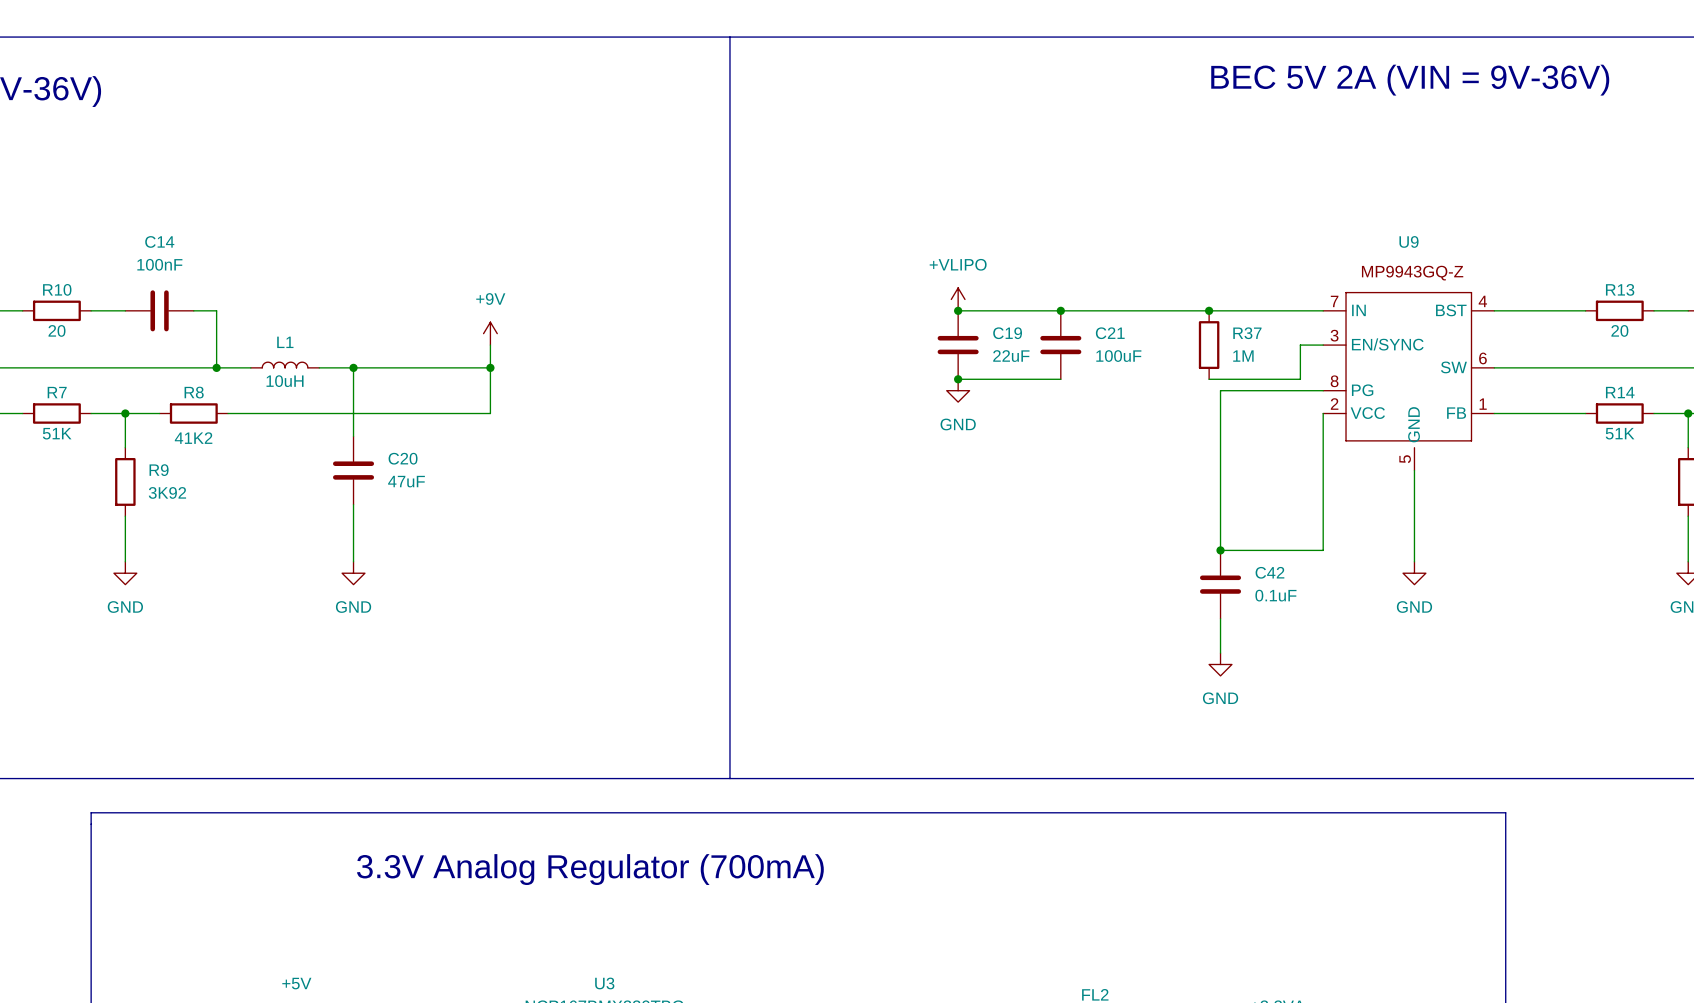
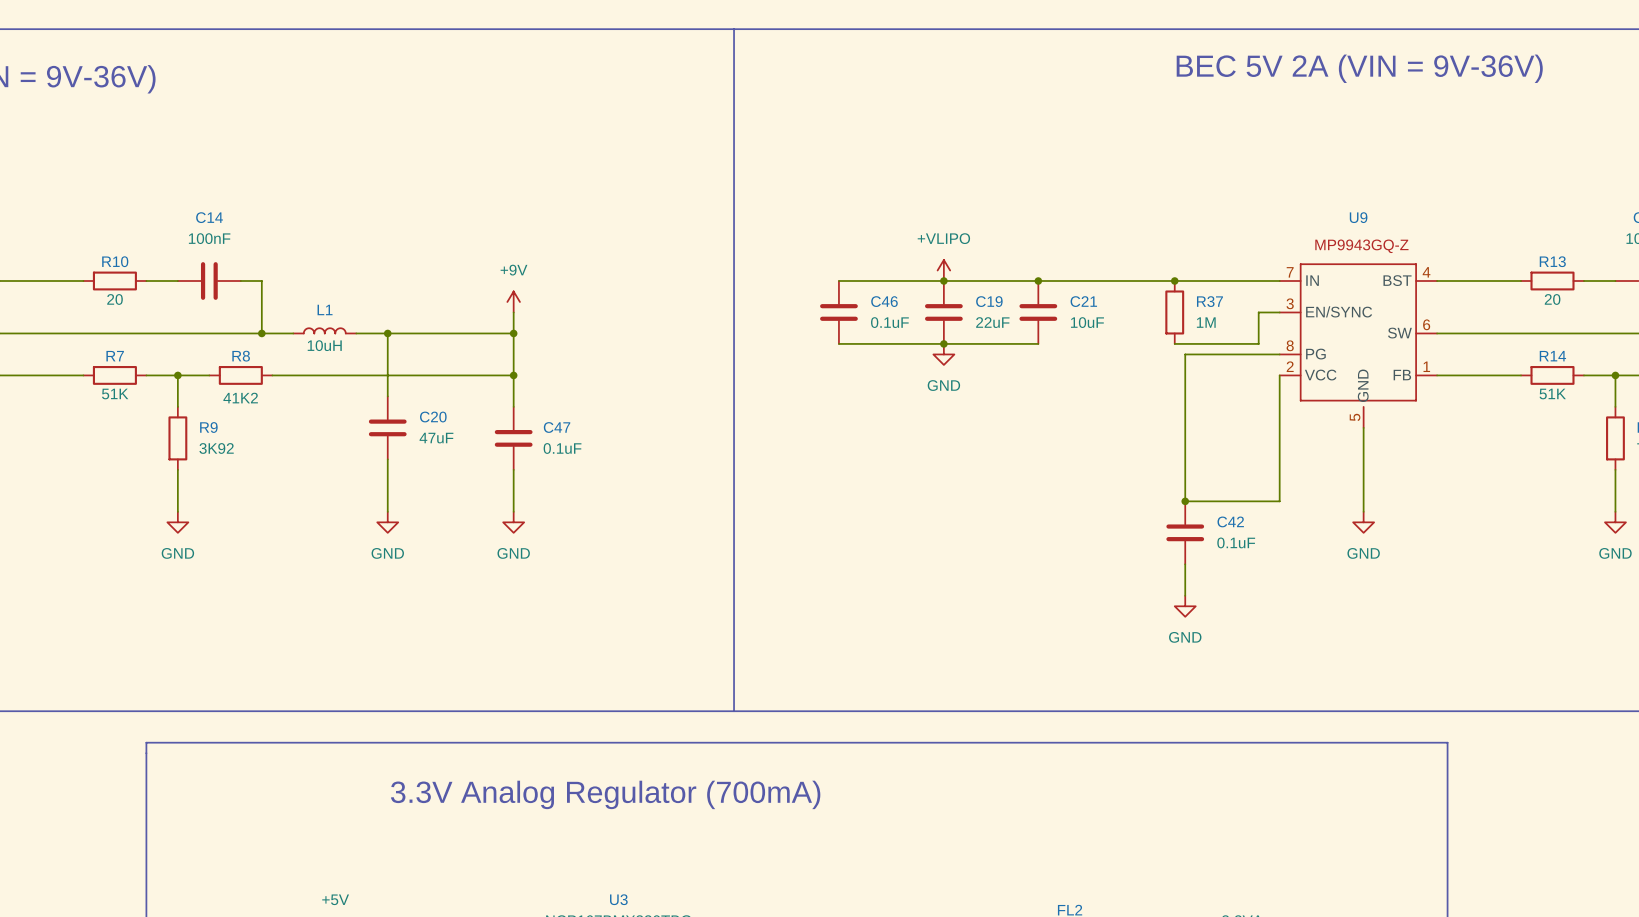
wire: none -> (838, 280) (943, 280)
C46: none -> 0.1uF (838, 312)
C21 value: 100uF (1118, 356) -> 10uF (1087, 322)
wire: none -> (838, 343) (943, 343)
wire: none -> (513, 375) (513, 406)
junction: none -> (513, 375)
C47: none -> 0.1uF (513, 438)
wire: none -> (513, 469) (513, 511)
power symbol: none -> GND (513, 522)

